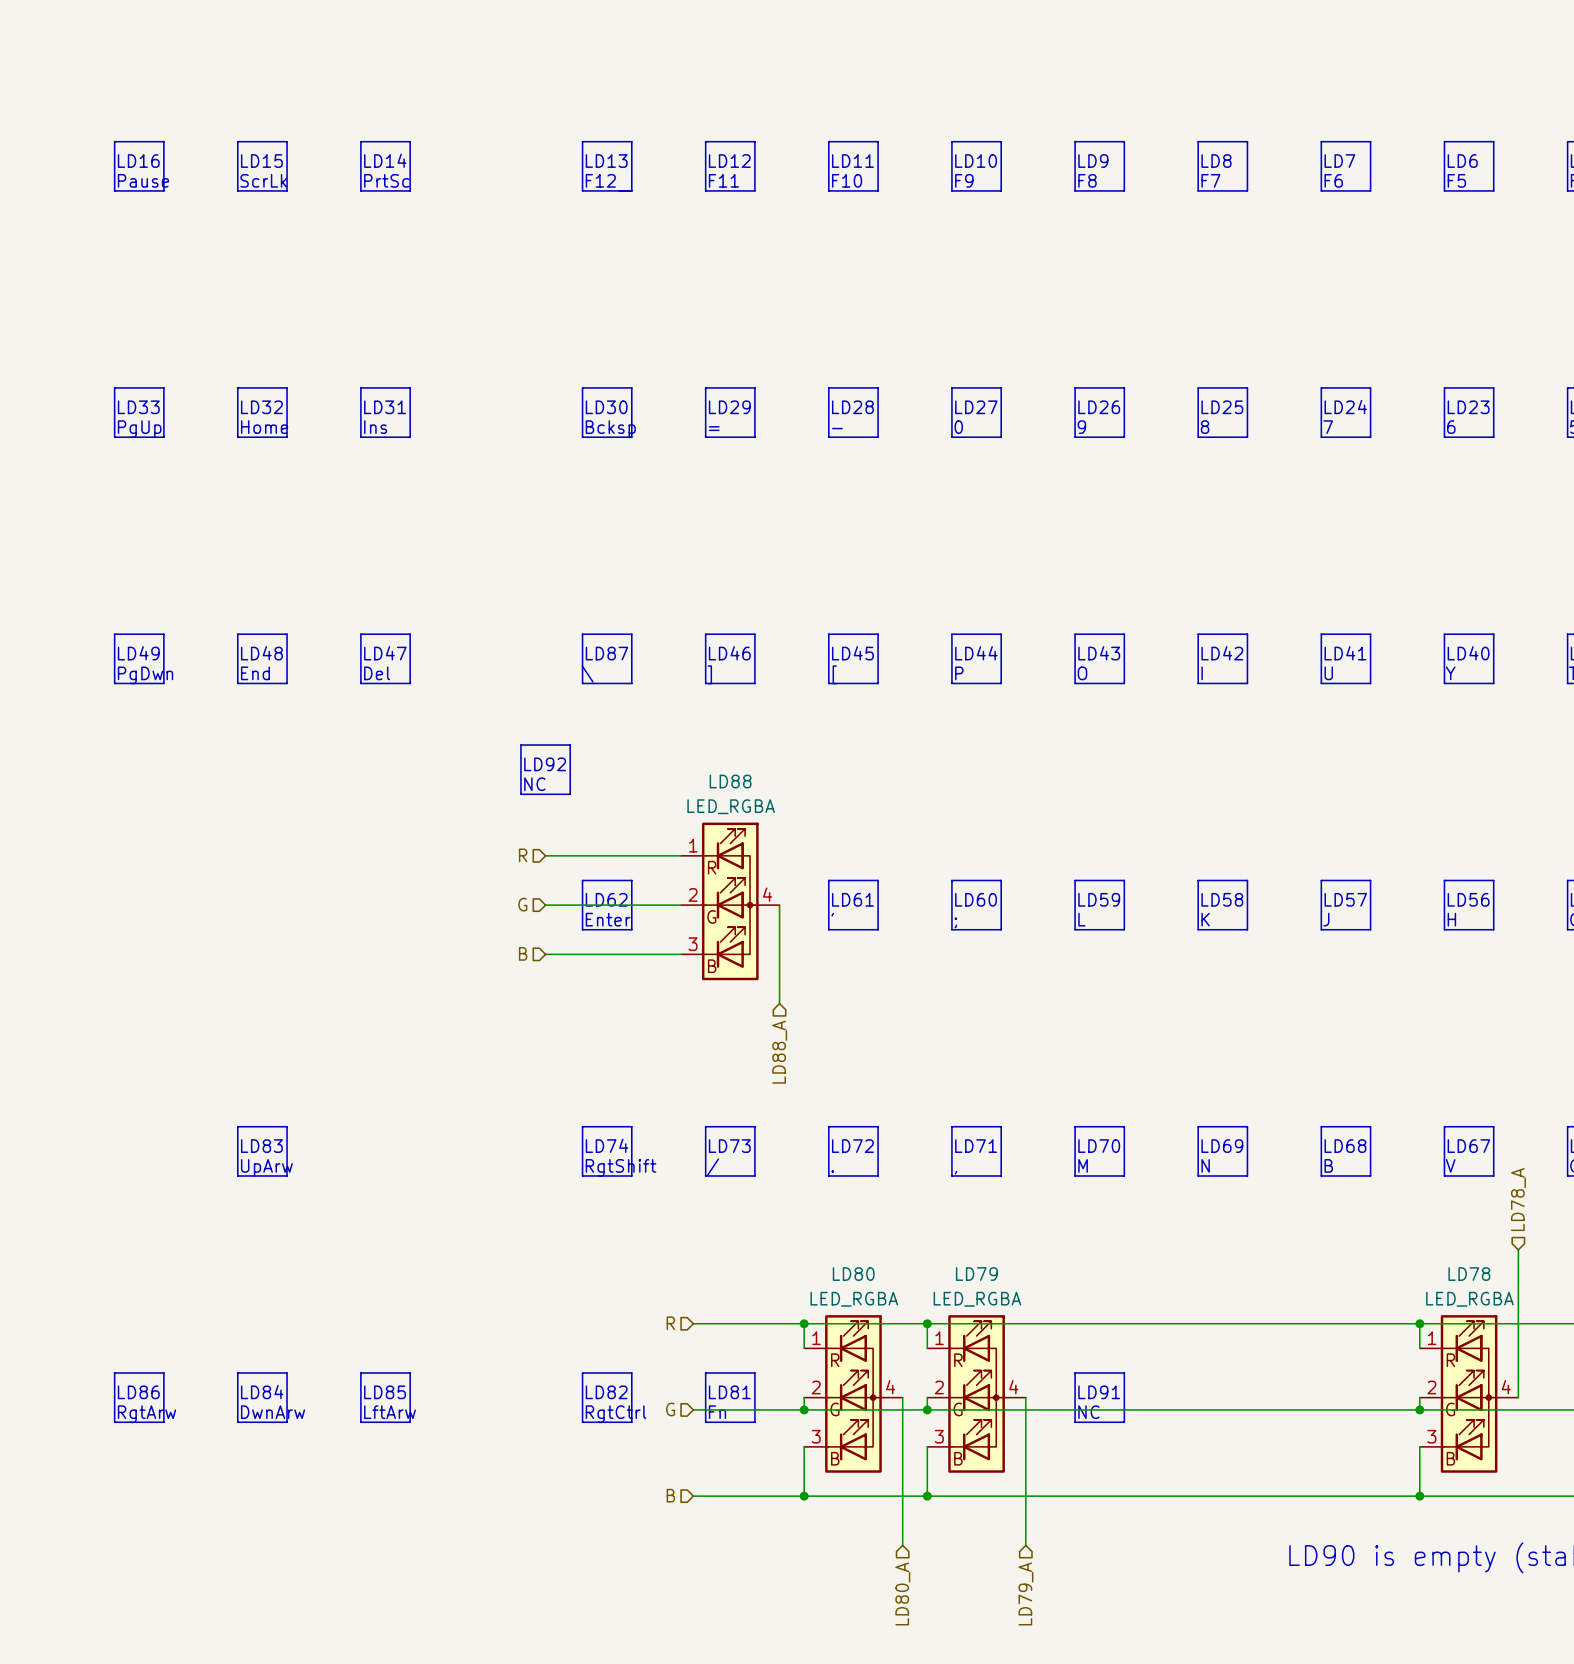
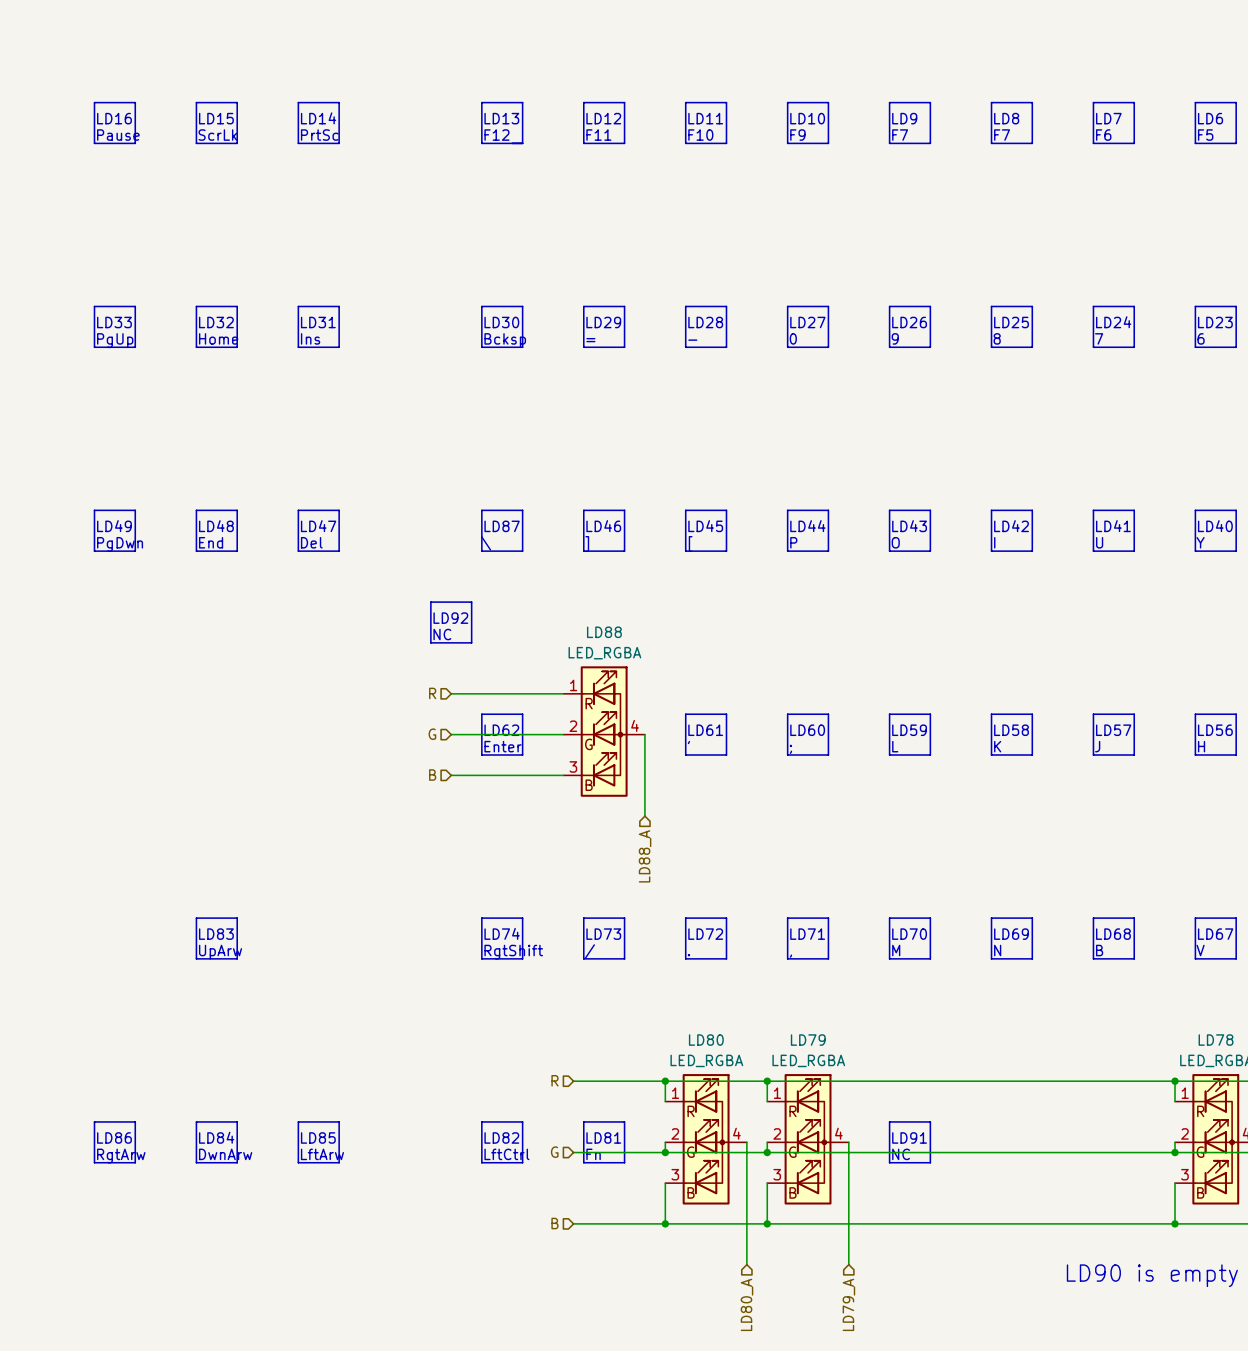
text: F8 (1087, 180) -> F7 (900, 135)
text: RgtCtrl (616, 1414) -> LftCtrl (506, 1154)

